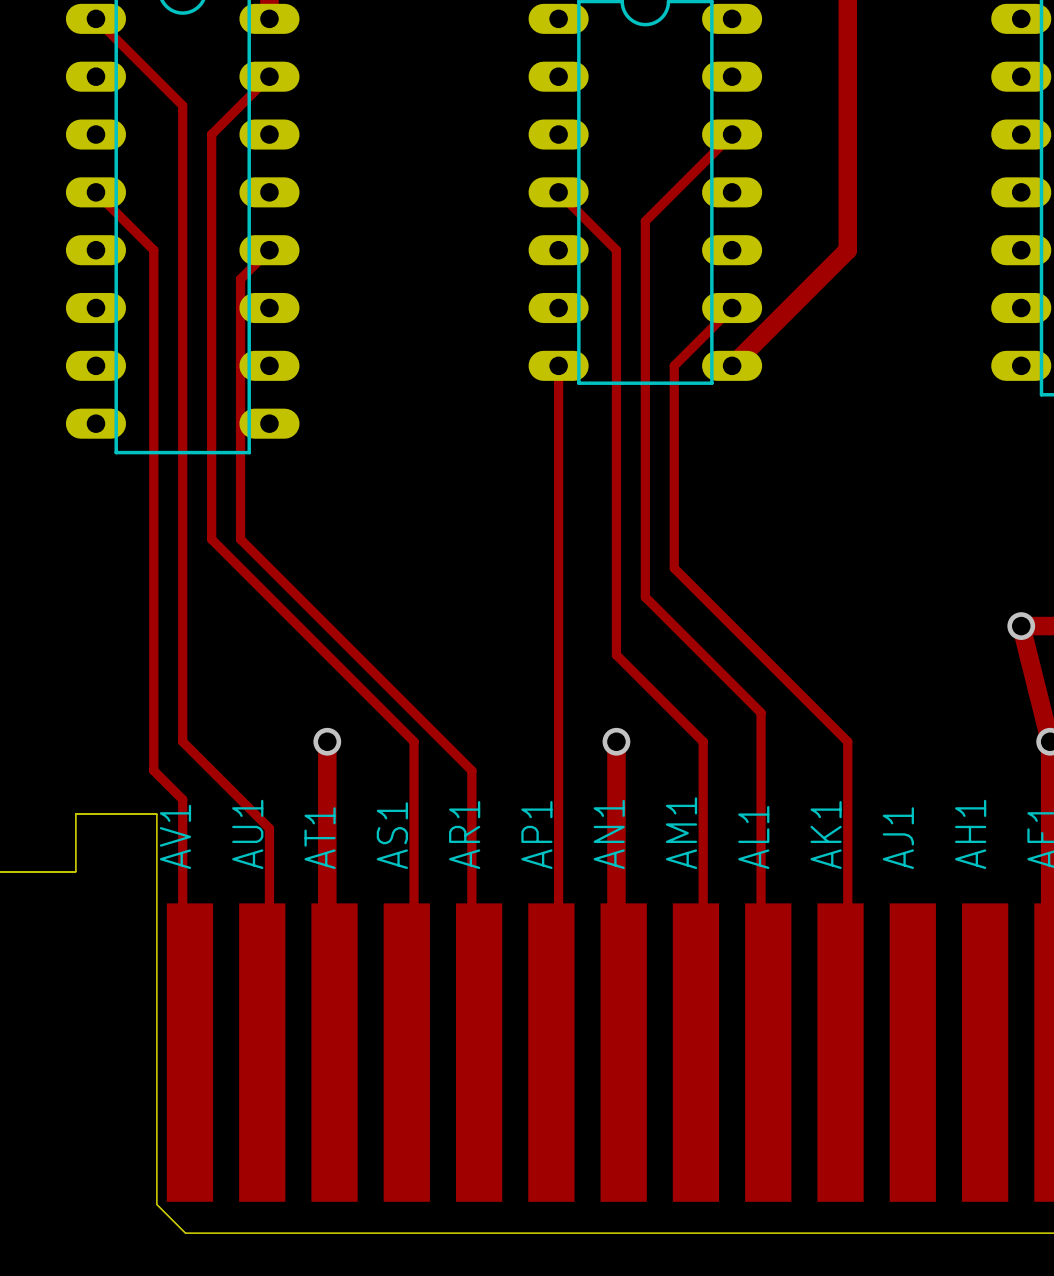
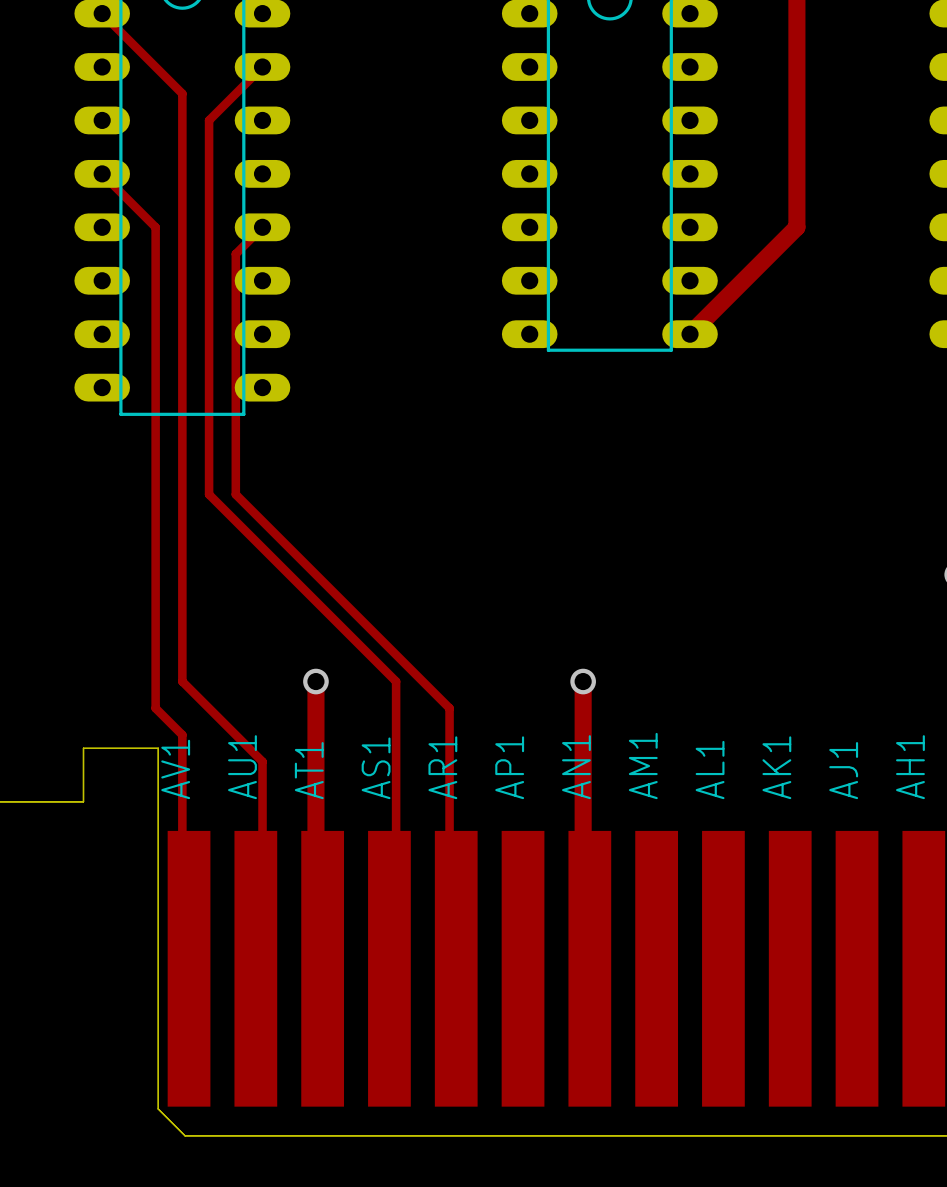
track: (732, 134) (645, 221) (645, 597) (761, 712) (761, 1045) (768, 1052) -> none
track: (558, 192) (616, 250) (616, 655) (703, 741) (703, 1045) (695, 1052) -> none
track: (732, 308) (674, 365) (674, 568) (847, 741) (847, 1045) (840, 1052) -> none
track: (558, 365) (558, 1045) (551, 1052) -> none

